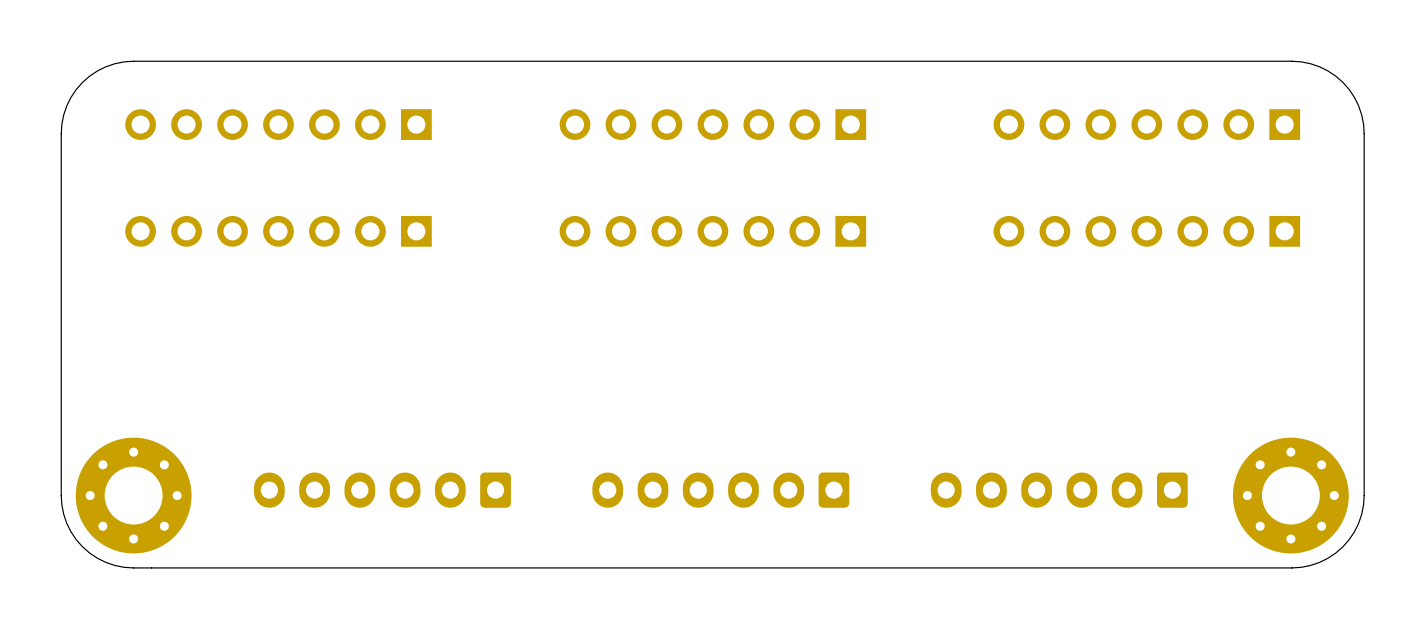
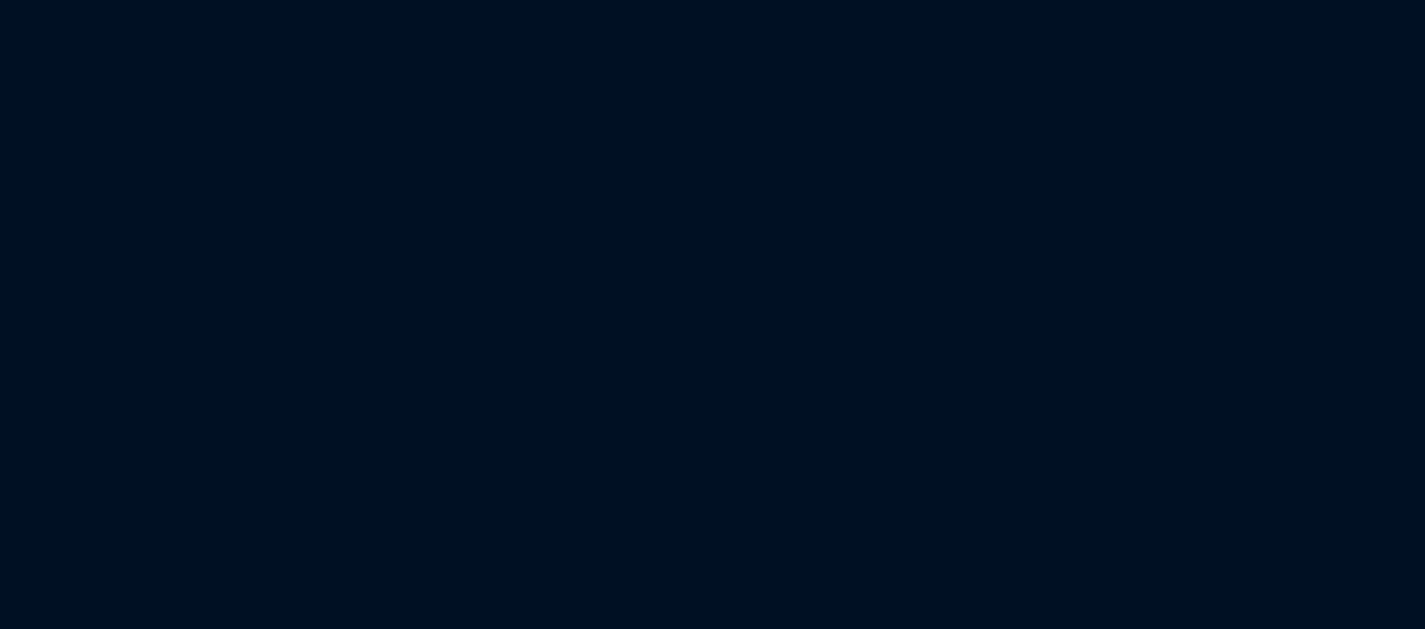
board edge: (1291, 61) (133, 61) (105, 66) (89, 76) (76, 89) (66, 105) (61, 124) (61, 495) (66, 523) (76, 539) (89, 552) (105, 562) (133, 567) (1291, 567) (1319, 562) (1335, 552) (1349, 539) (1358, 523) (1363, 505) (1364, 133) (1358, 105) (1342, 82) (1319, 66) (1291, 61) -> none
part: (278, 124) -> none
part: (712, 124) -> none
part: (1146, 124) -> none
part: (278, 231) -> none
part: (712, 231) -> none
part: (1146, 231) -> none
part: (382, 490) -> none
part: (720, 490) -> none
part: (1059, 490) -> none
part: (133, 495) -> none
part: (1290, 495) -> none

